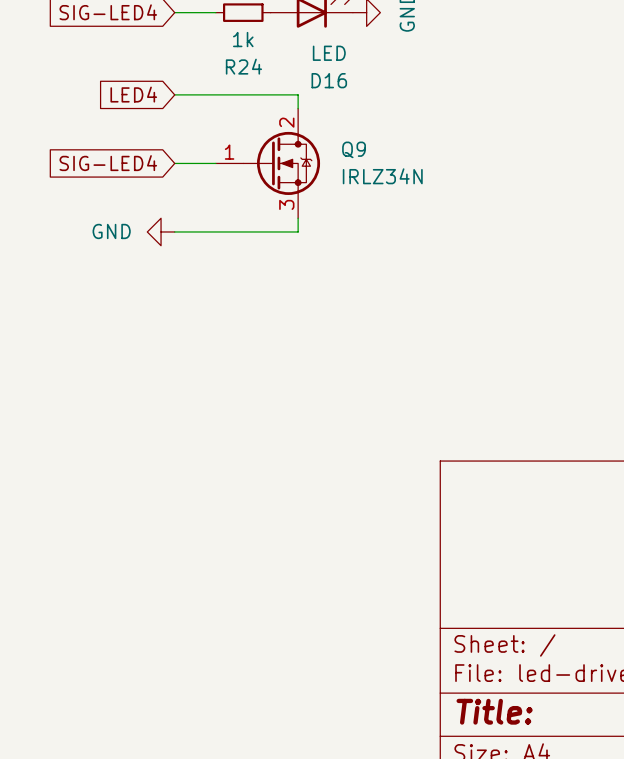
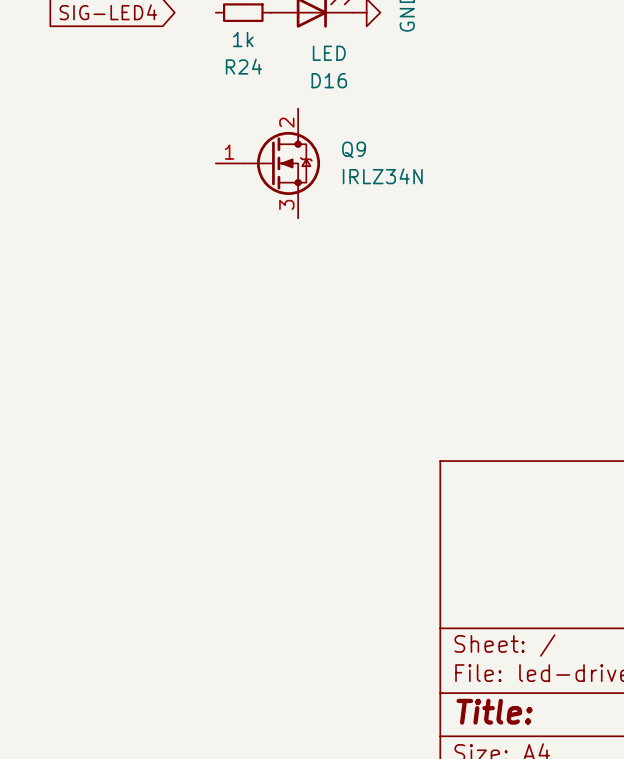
wire: (174, 12) (215, 12) -> none
global label: LED4 (133, 94) -> none
wire: (174, 94) (298, 94) (298, 108) -> none
global label: SIG-LED4 (108, 163) -> none
wire: (174, 163) (215, 163) -> none
wire: (298, 218) (298, 231) (174, 231) -> none
power symbol: GND (161, 231) -> none

